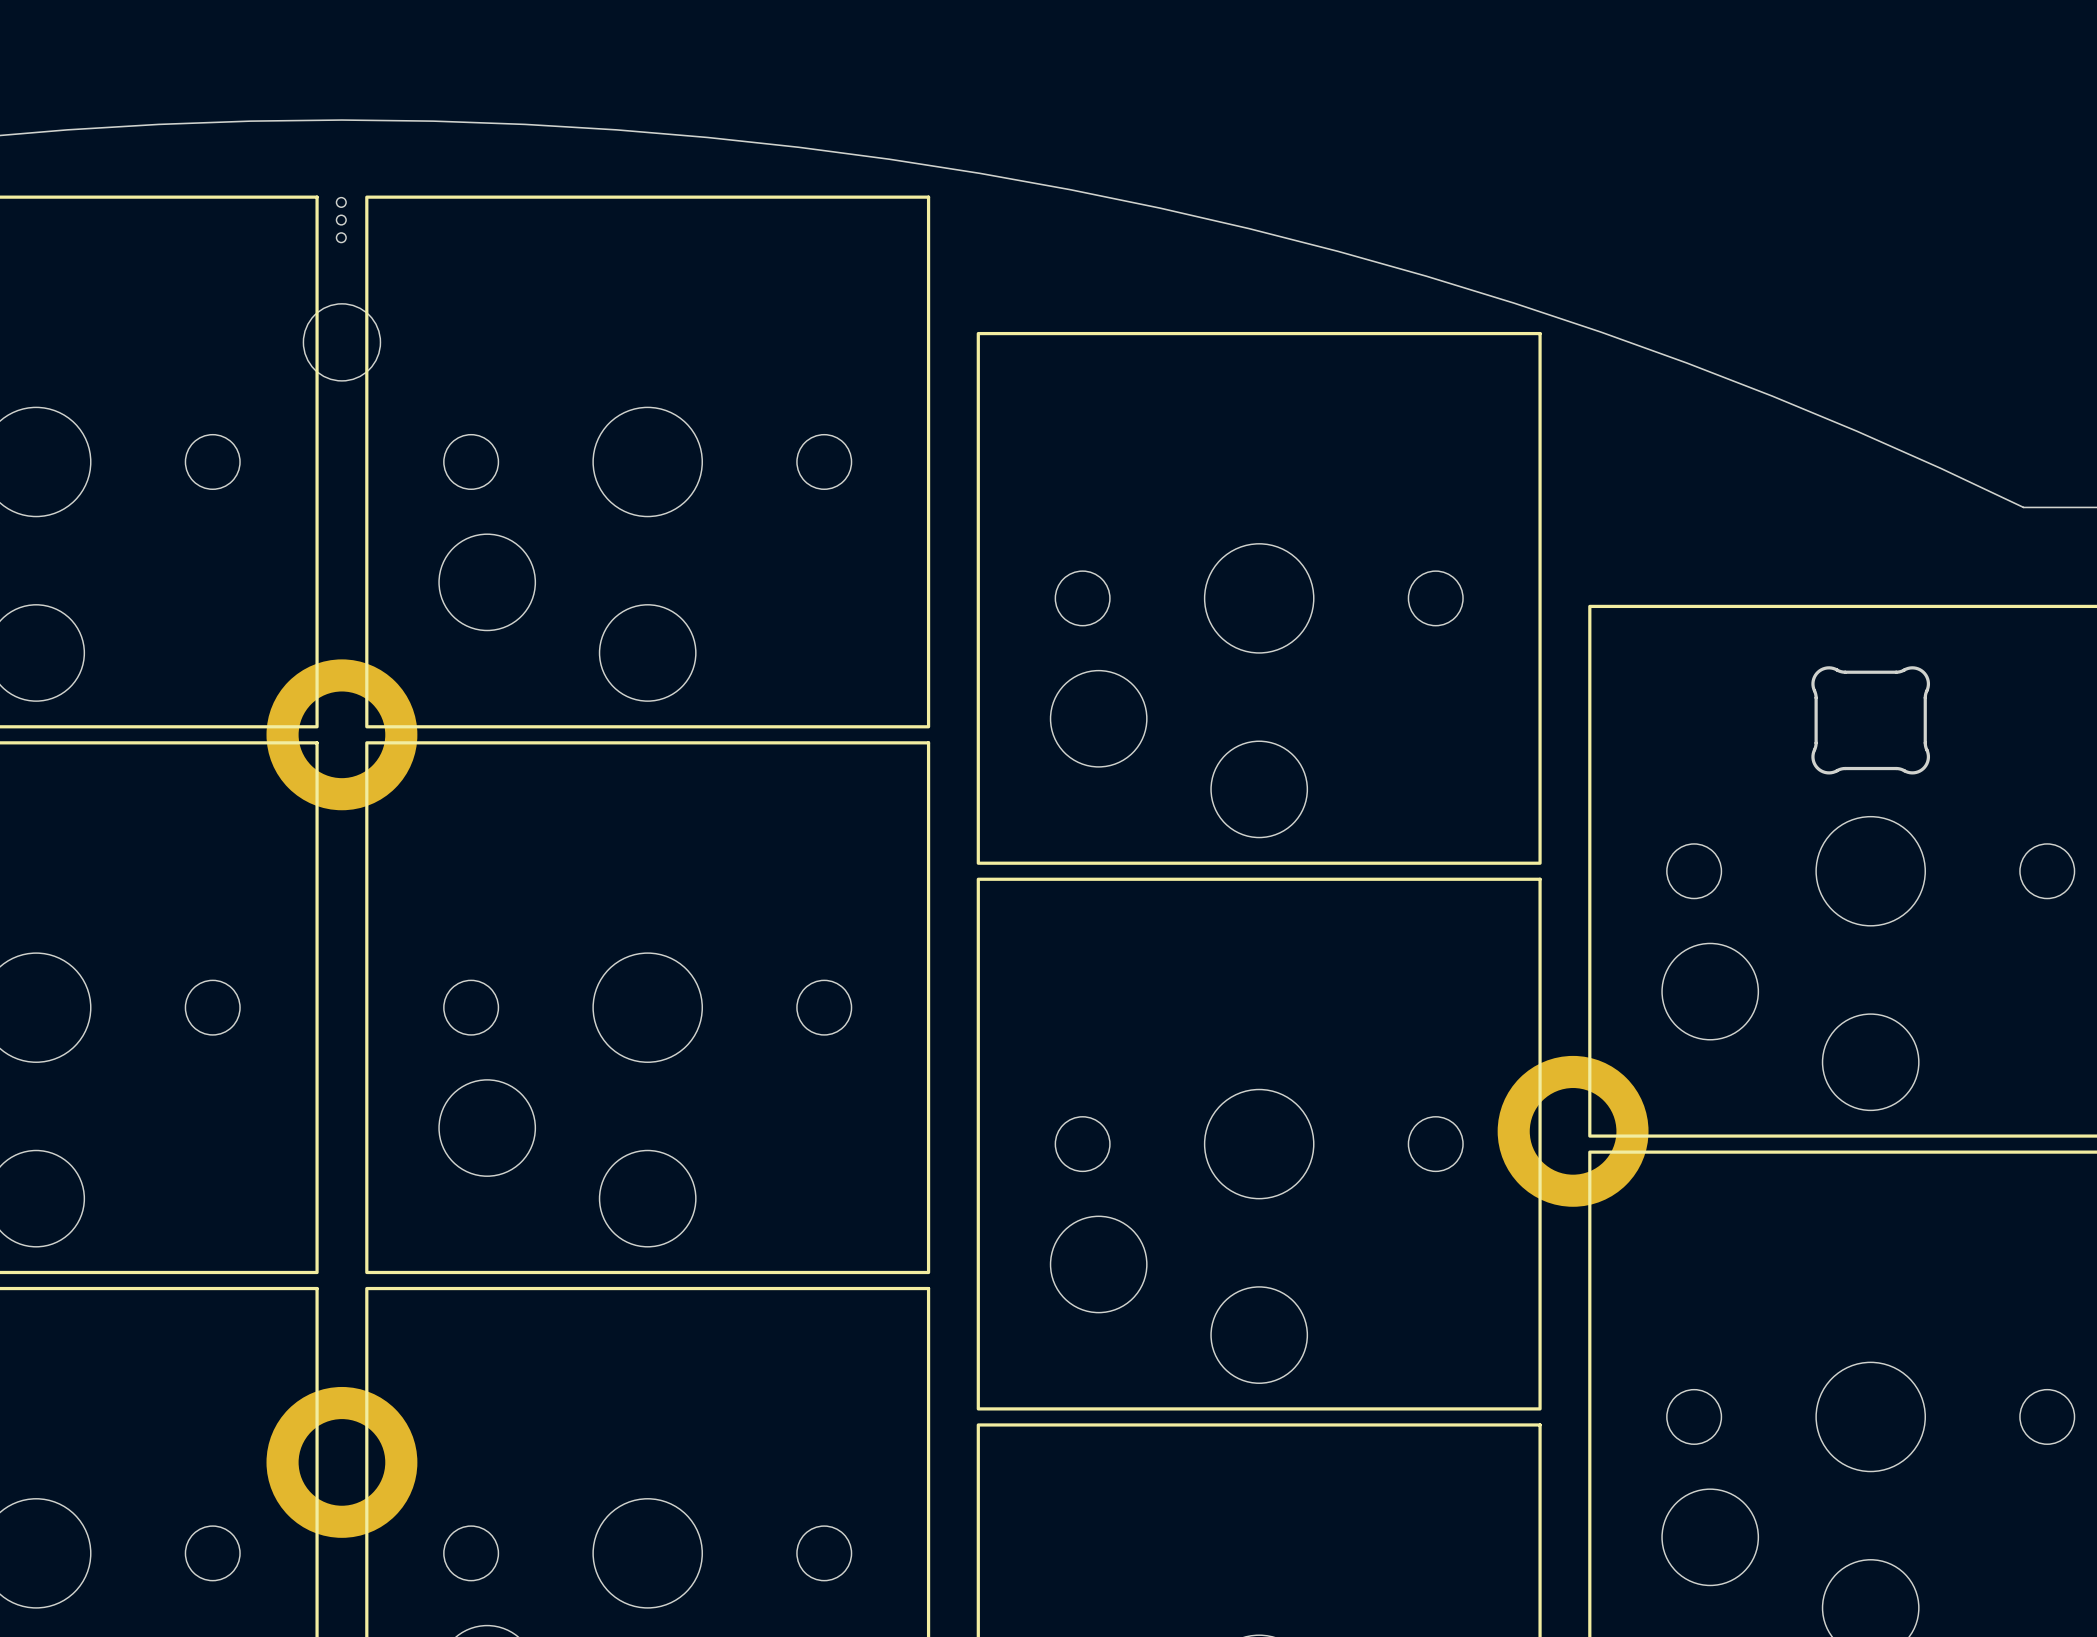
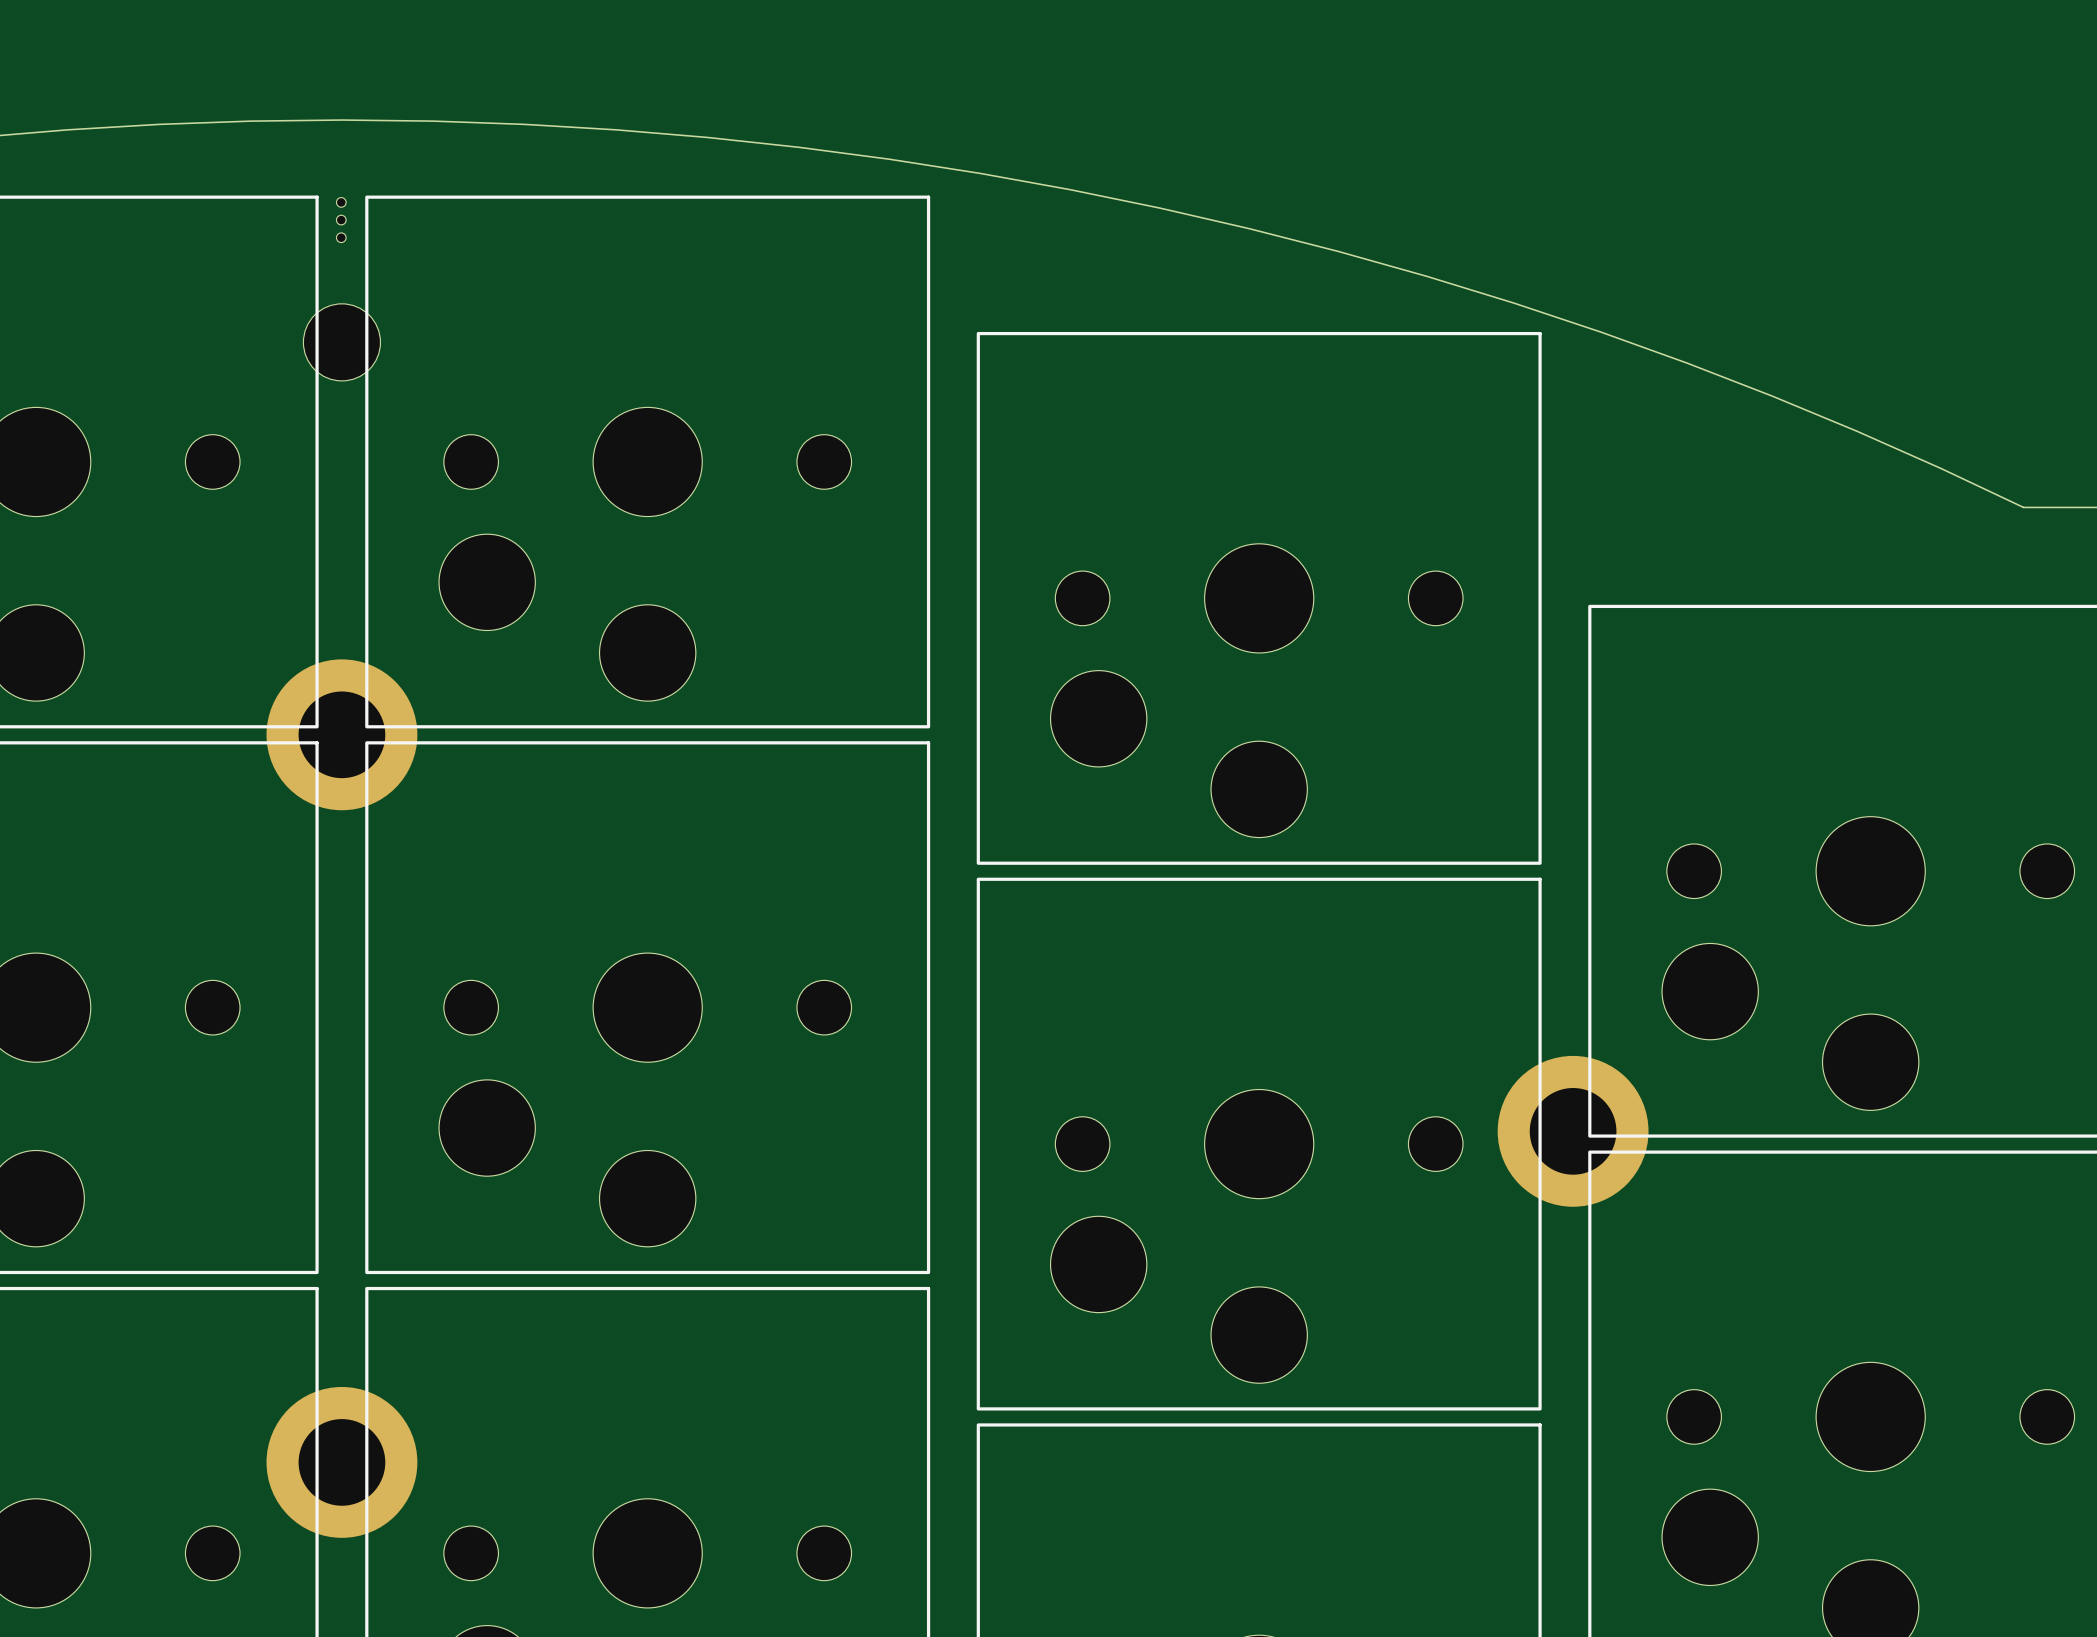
part: (1870, 720) -> none

